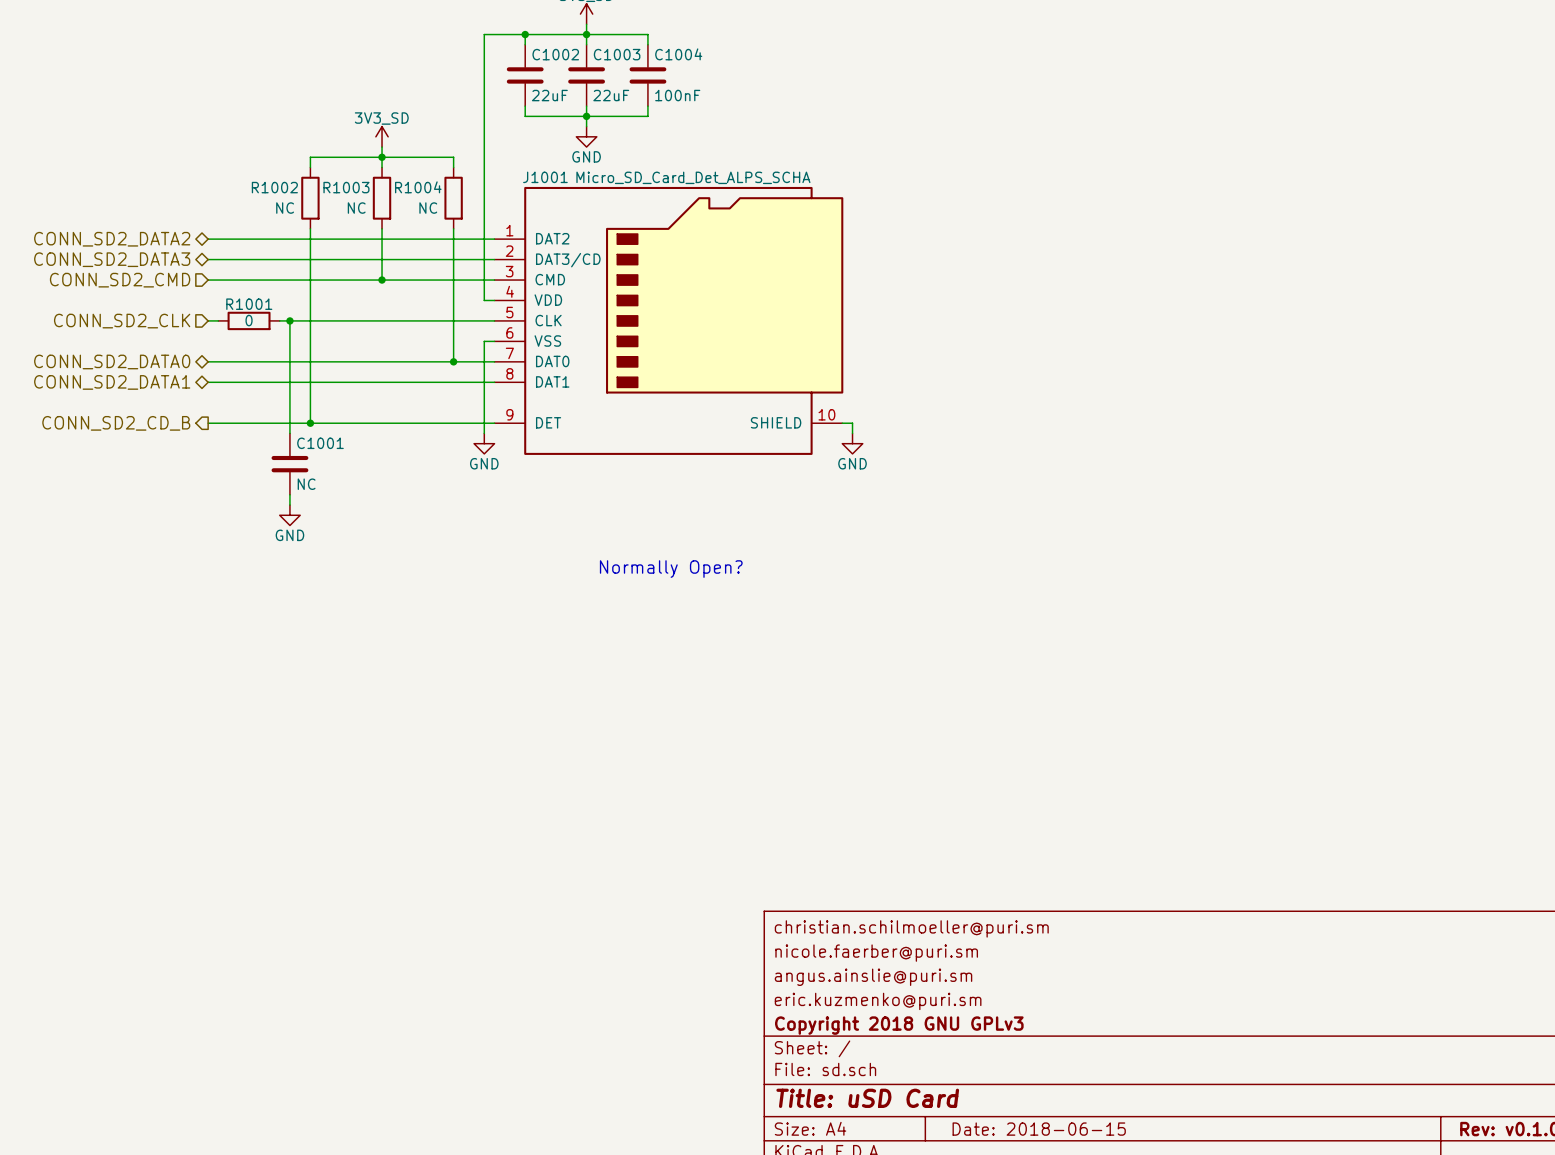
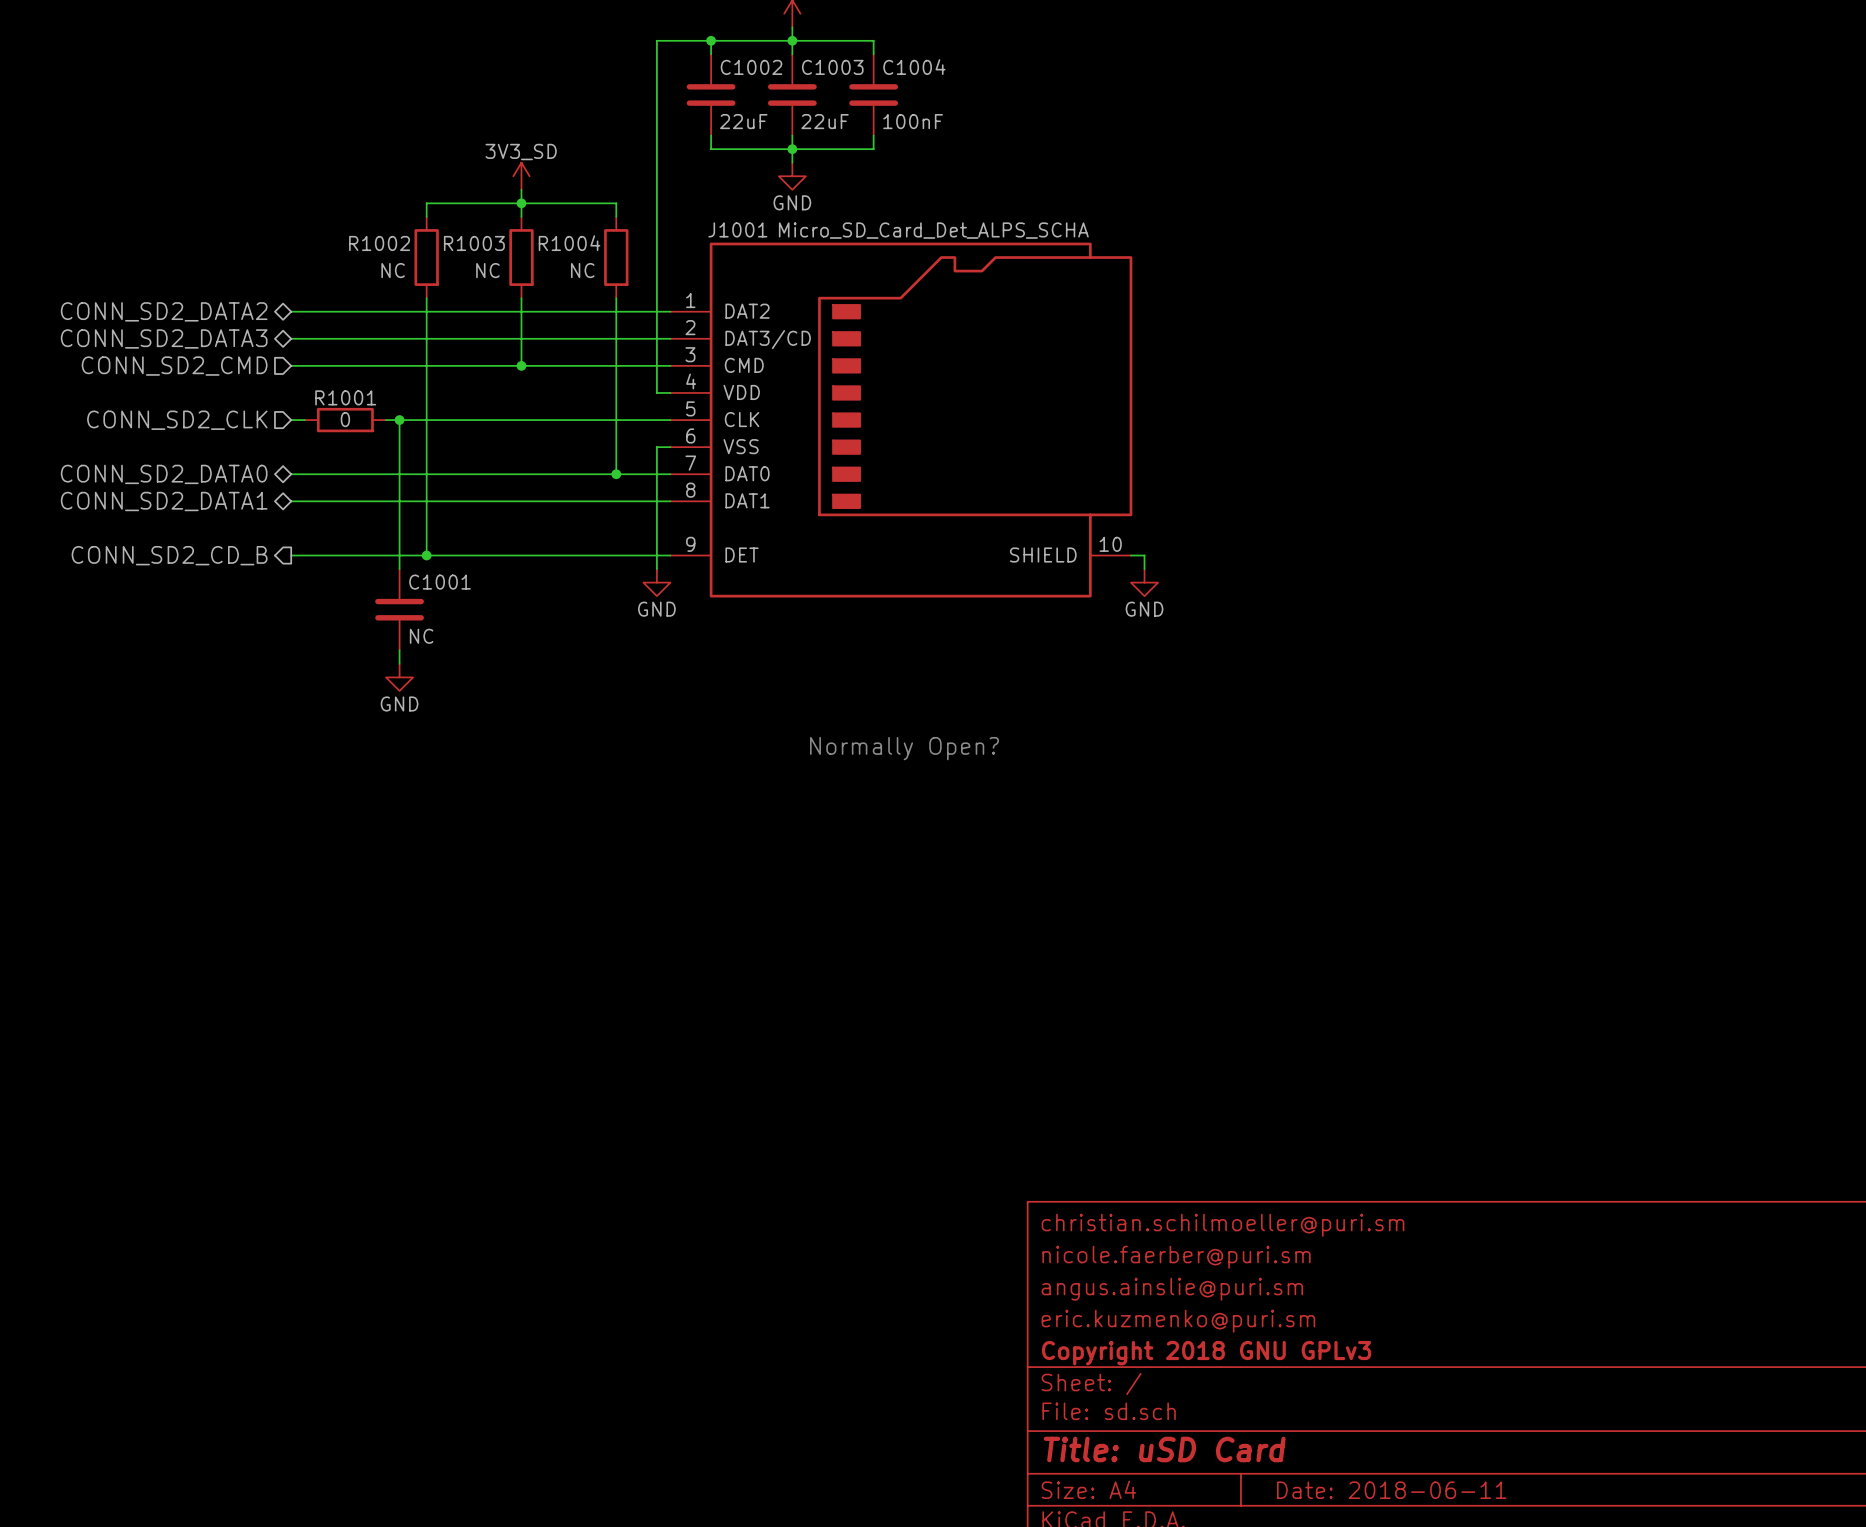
title block: Date: 2018-06-15 (1039, 1129) -> Date: 2018-06-11 (1391, 1490)

